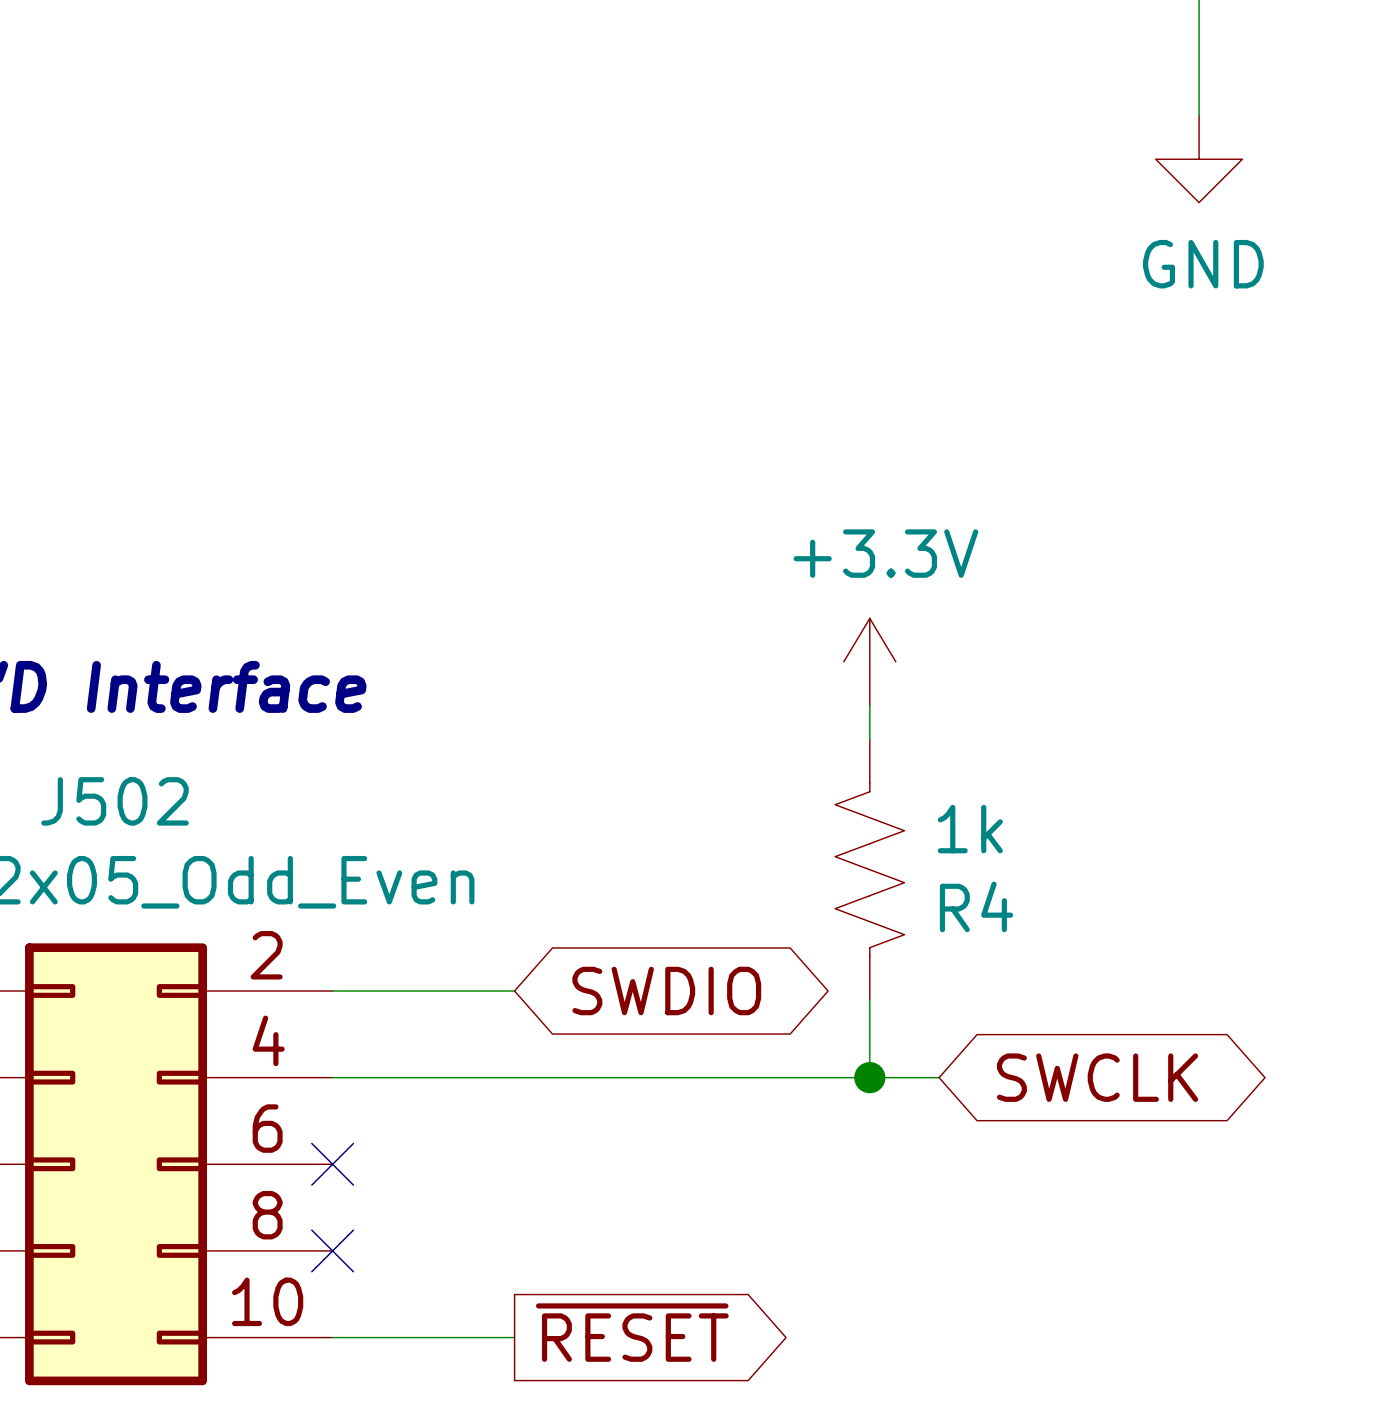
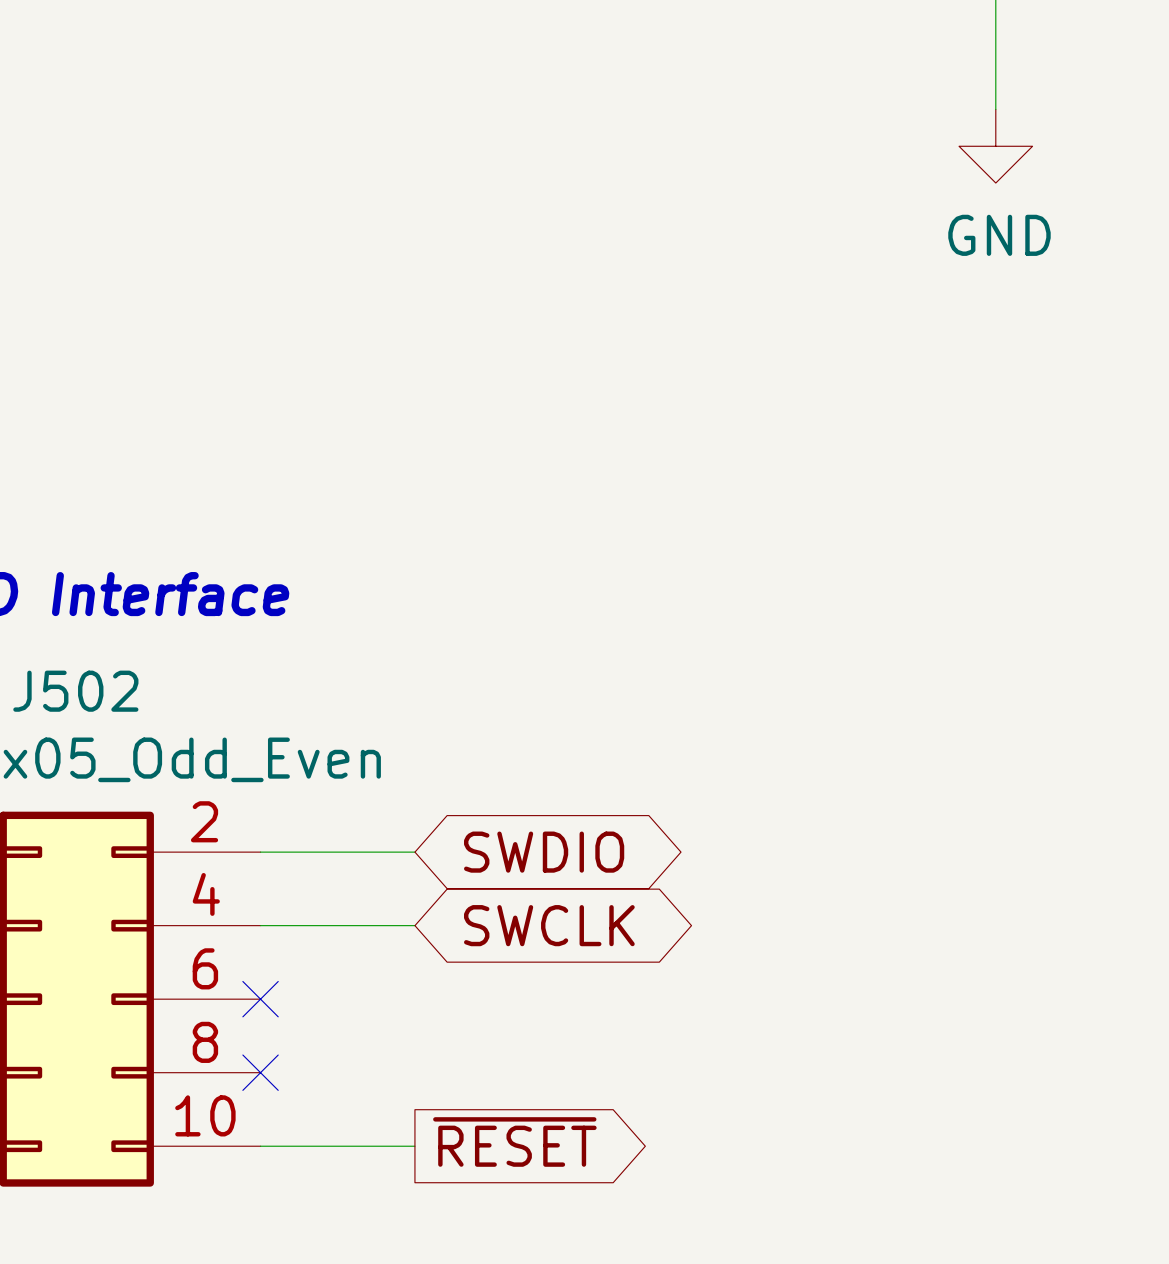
power symbol: +3.3V (869, 661) -> none
wire: (869, 705) (869, 739) -> none
R4: 1k (869, 869) -> none
wire: (869, 999) (869, 1077) -> none
wire: (514, 1077) (939, 1077) -> none
junction: (869, 1077) -> none
global label position: SWCLK (1097, 1077) -> SWCLK (549, 925)

